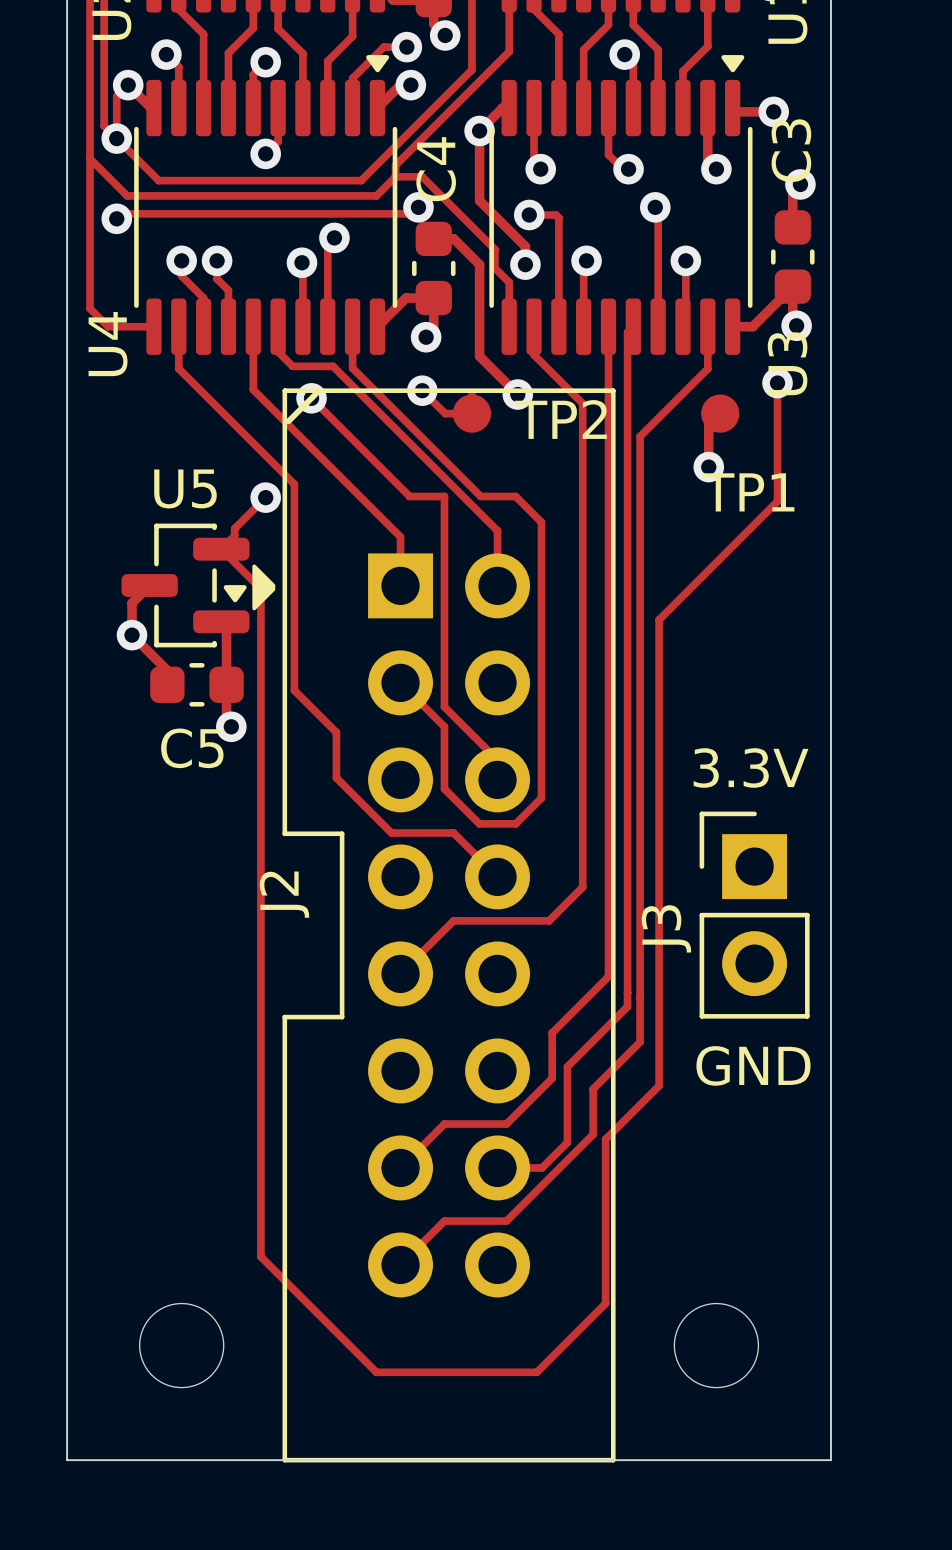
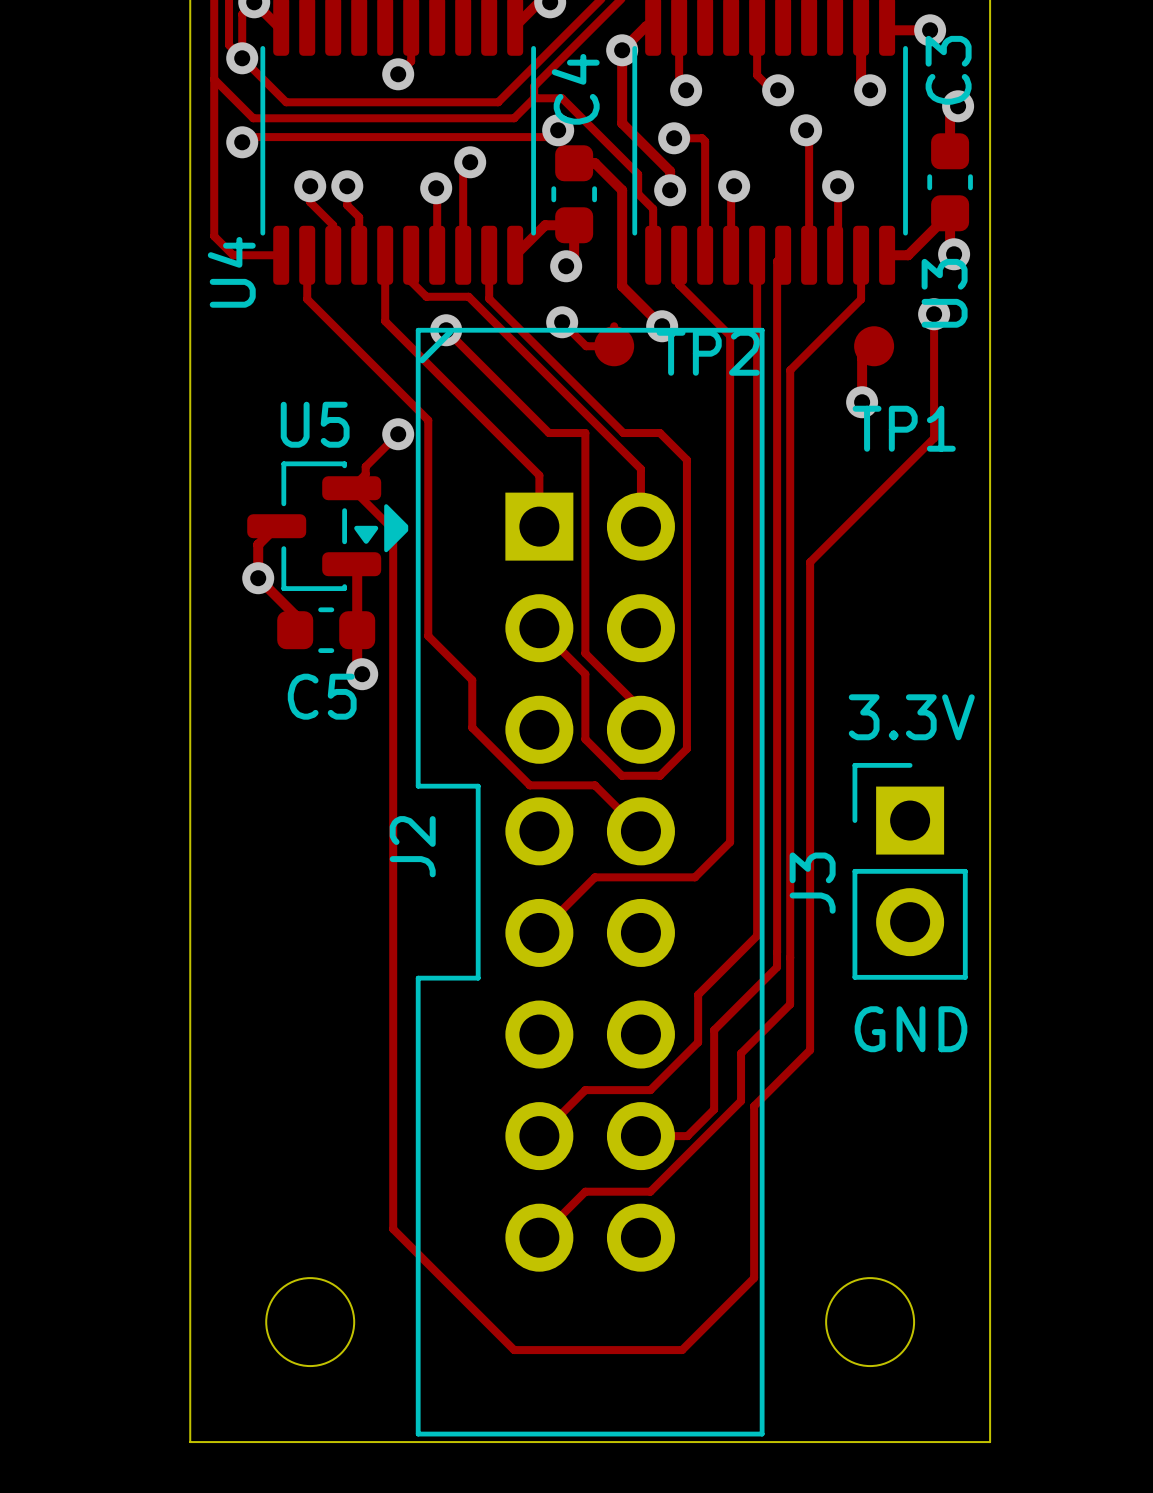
J2 footprint: [252, 388, 616, 1463] -> [384, 327, 765, 1437]

